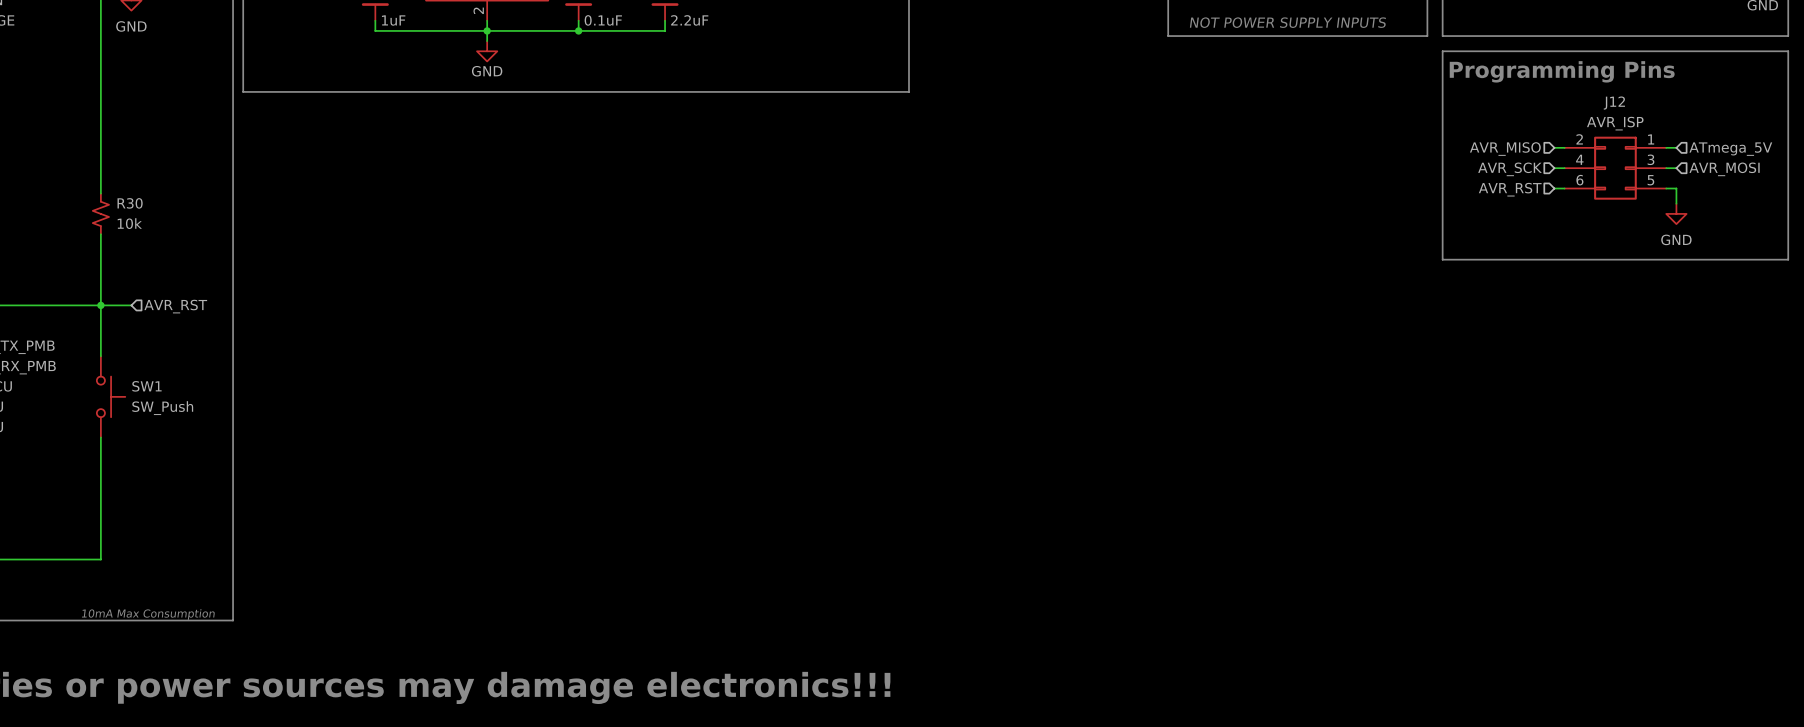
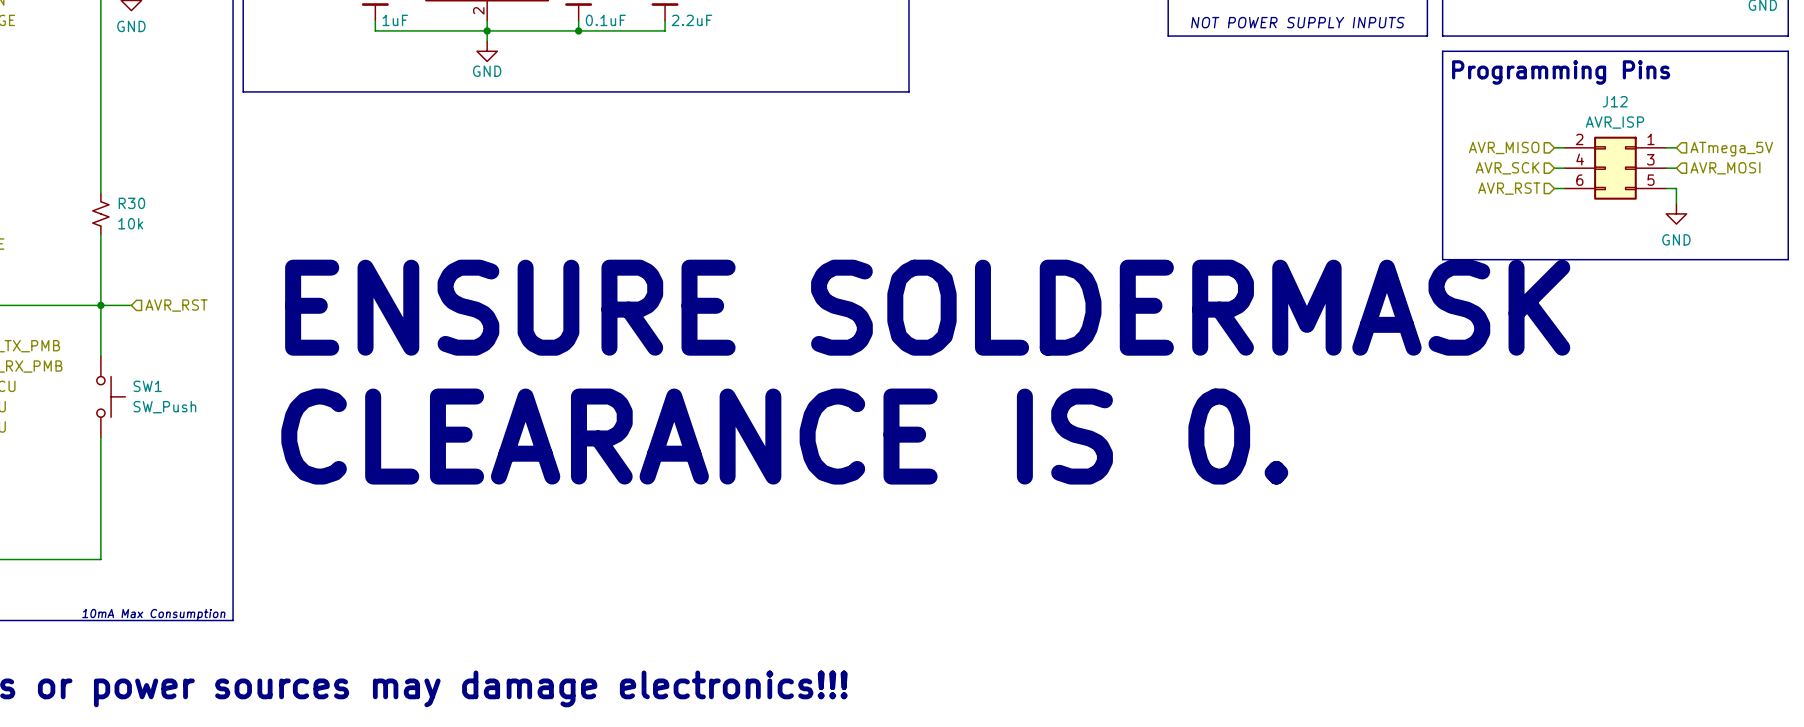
text: none -> ENSURE SOLDERMASK (927, 307)
text: none -> CLEARANCE IS 0. (784, 436)

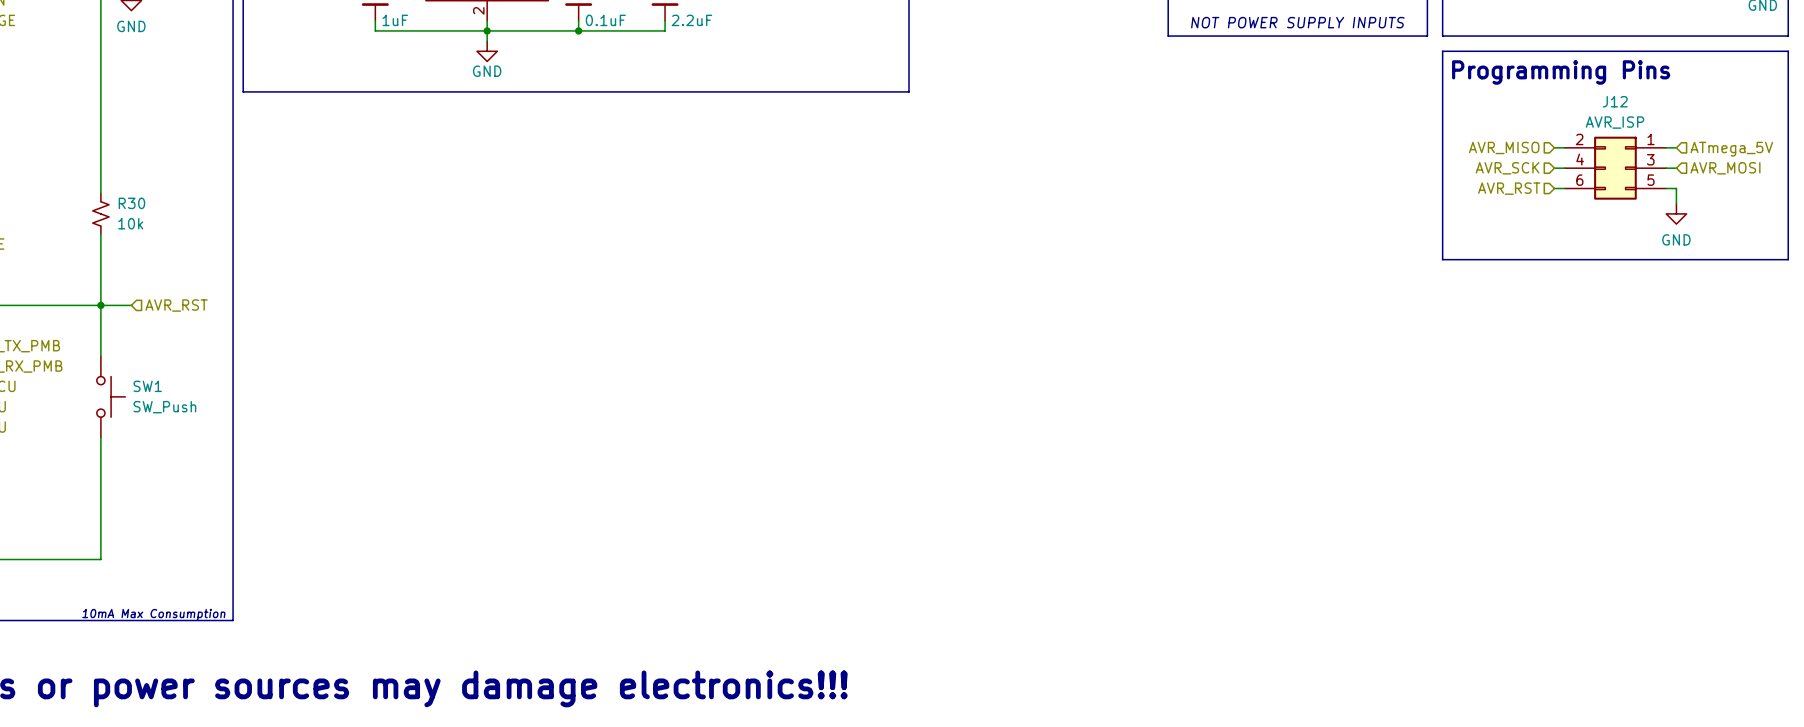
text: ENSURE SOLDERMASK (927, 307) -> none
text: CLEARANCE IS 0. (784, 436) -> none

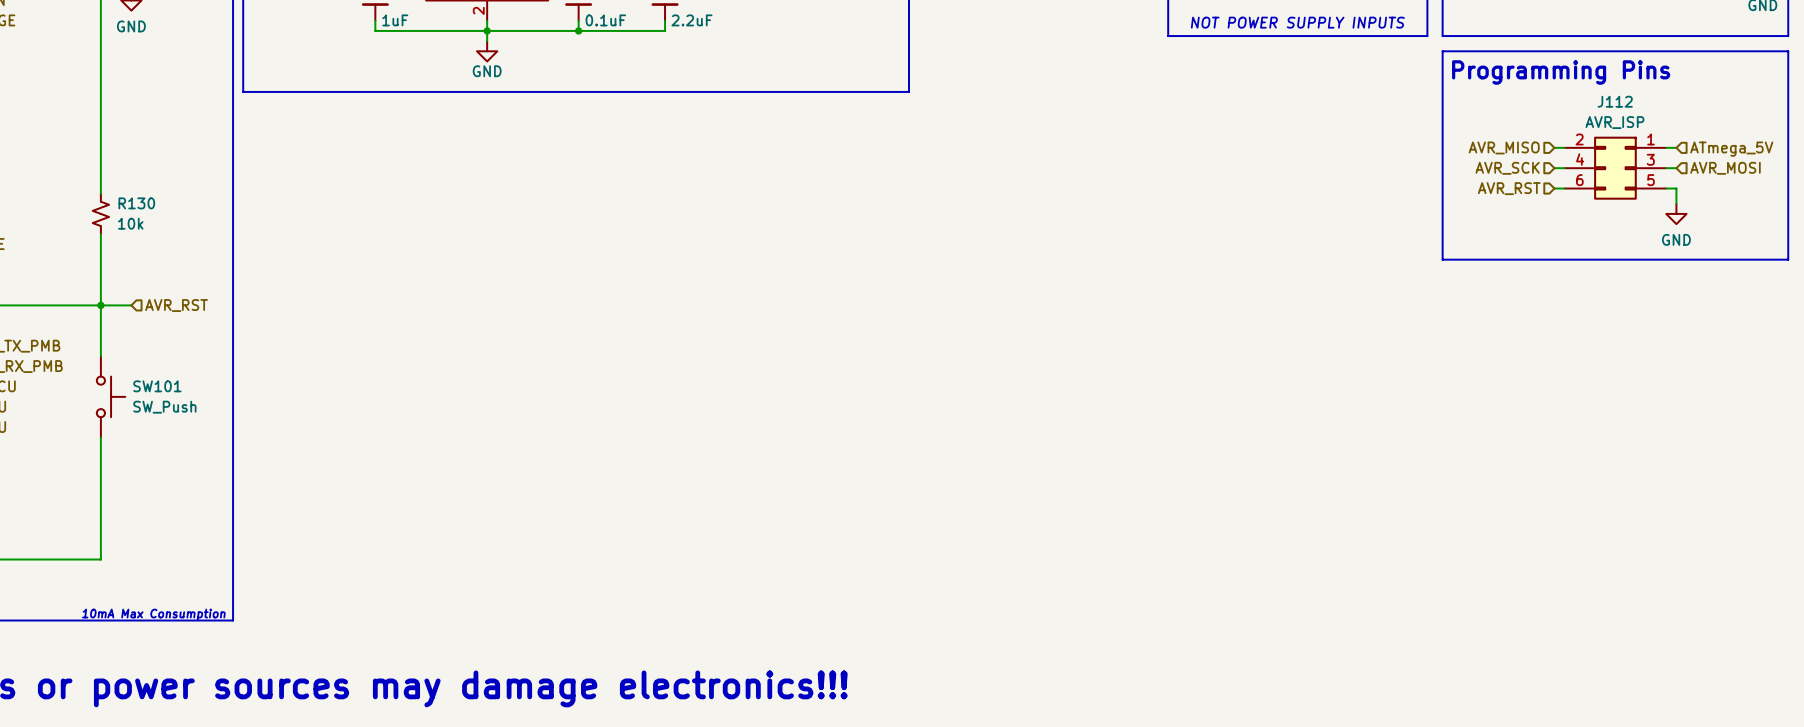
J12 name: J12 (1615, 101) -> J112 (1615, 101)
R30 name: R30 (131, 203) -> R130 (136, 203)
SW1 name: SW1 (147, 386) -> SW101 (157, 386)

